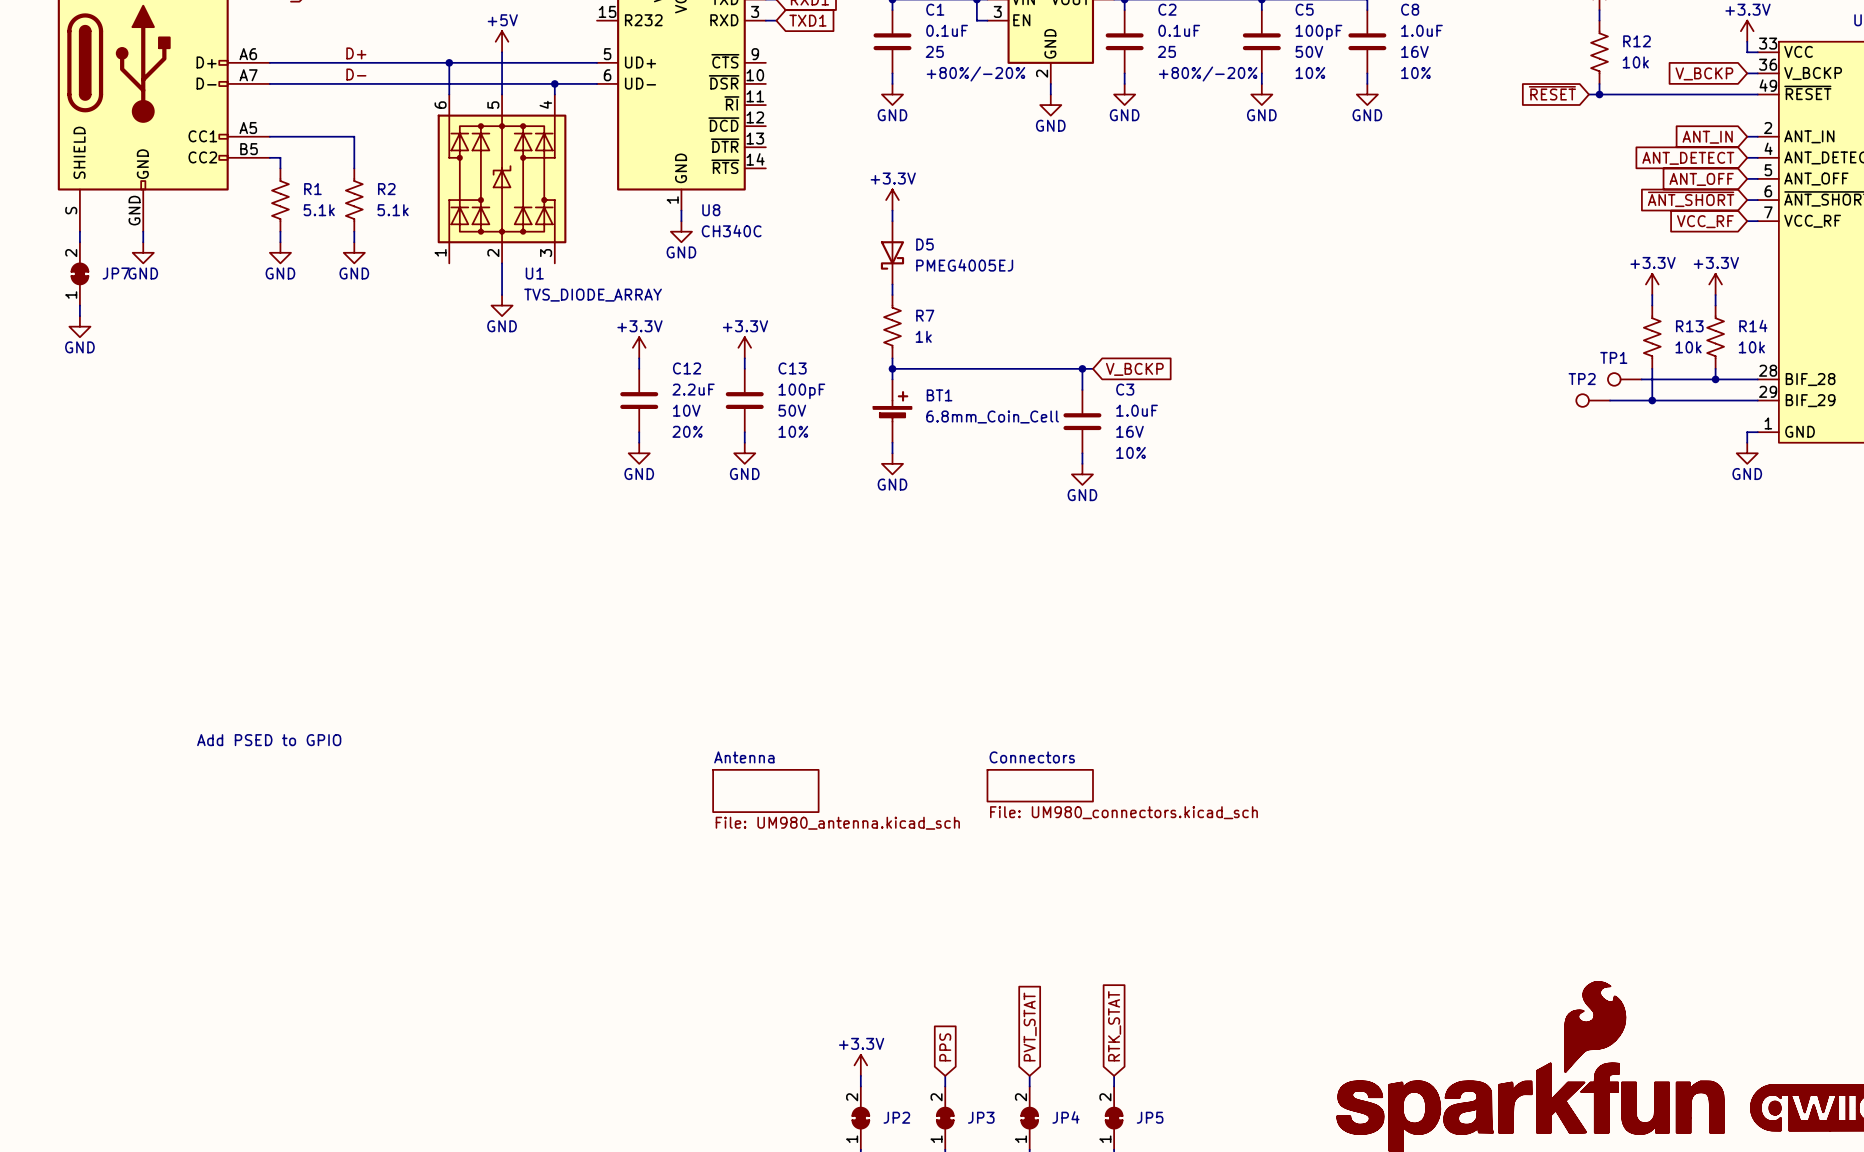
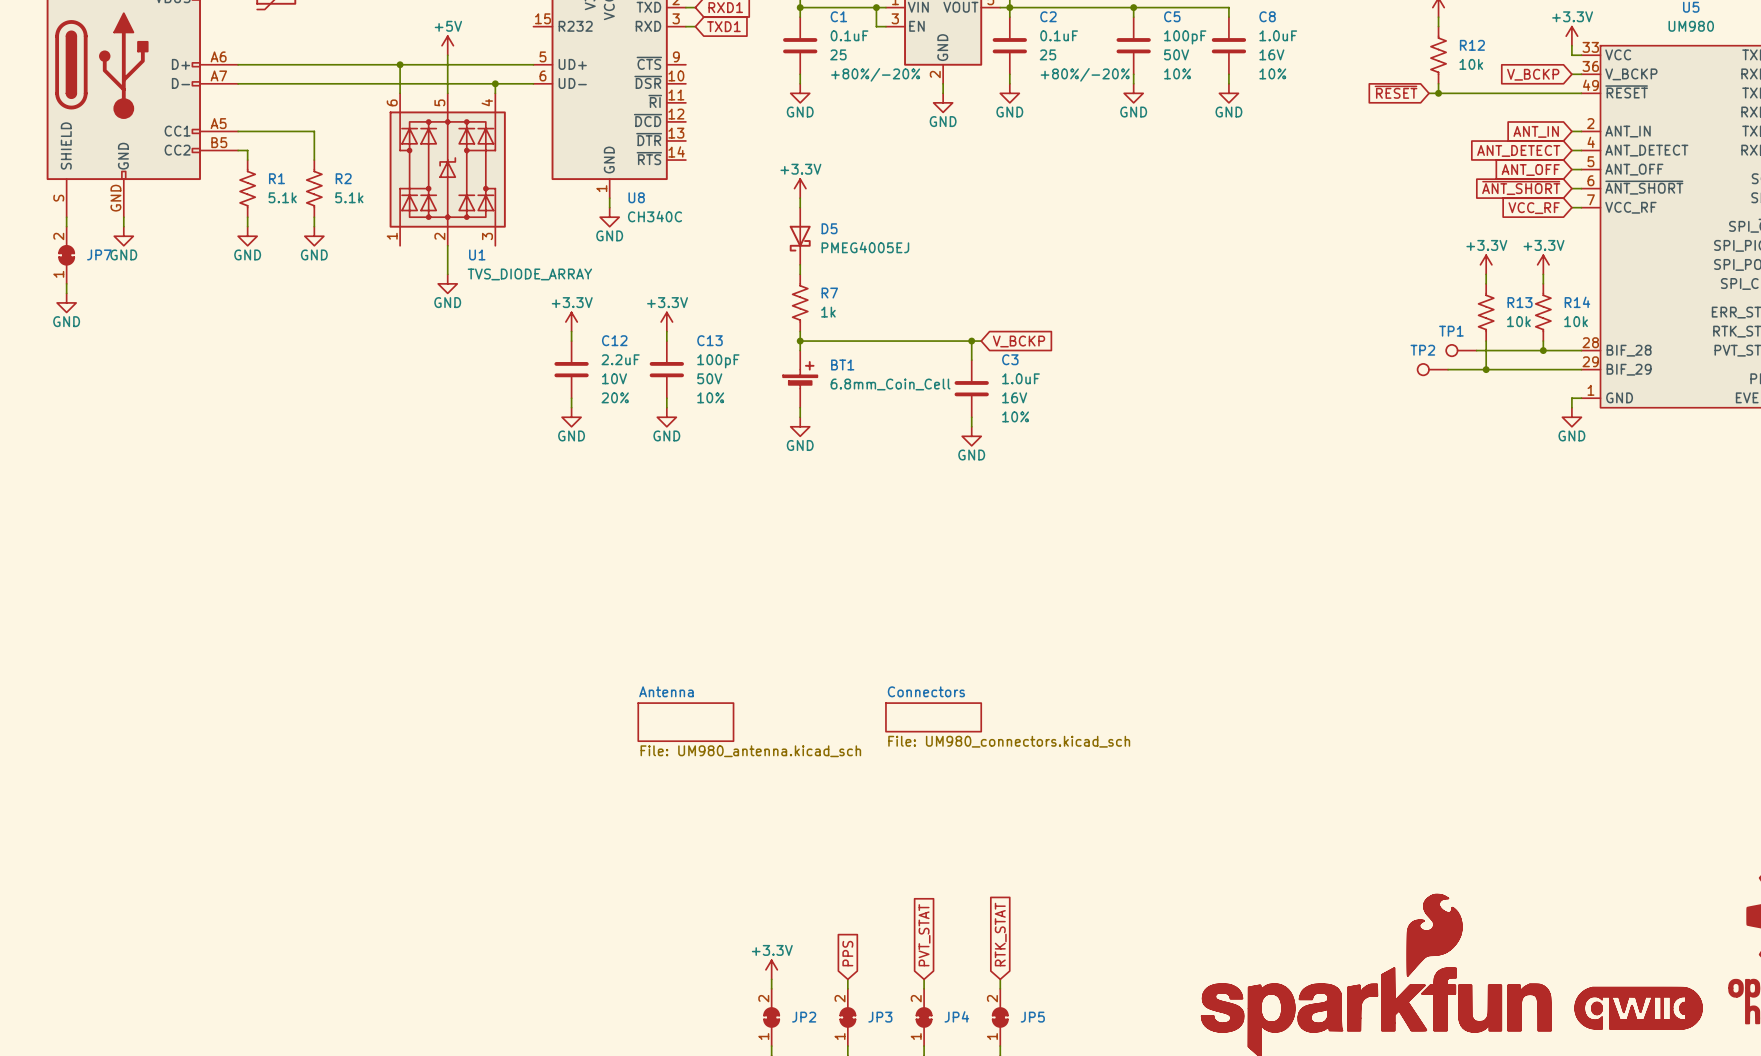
label: D+ (356, 53) -> none
label: D- (356, 74) -> none
text: Add PSED to GPIO (269, 740) -> none

